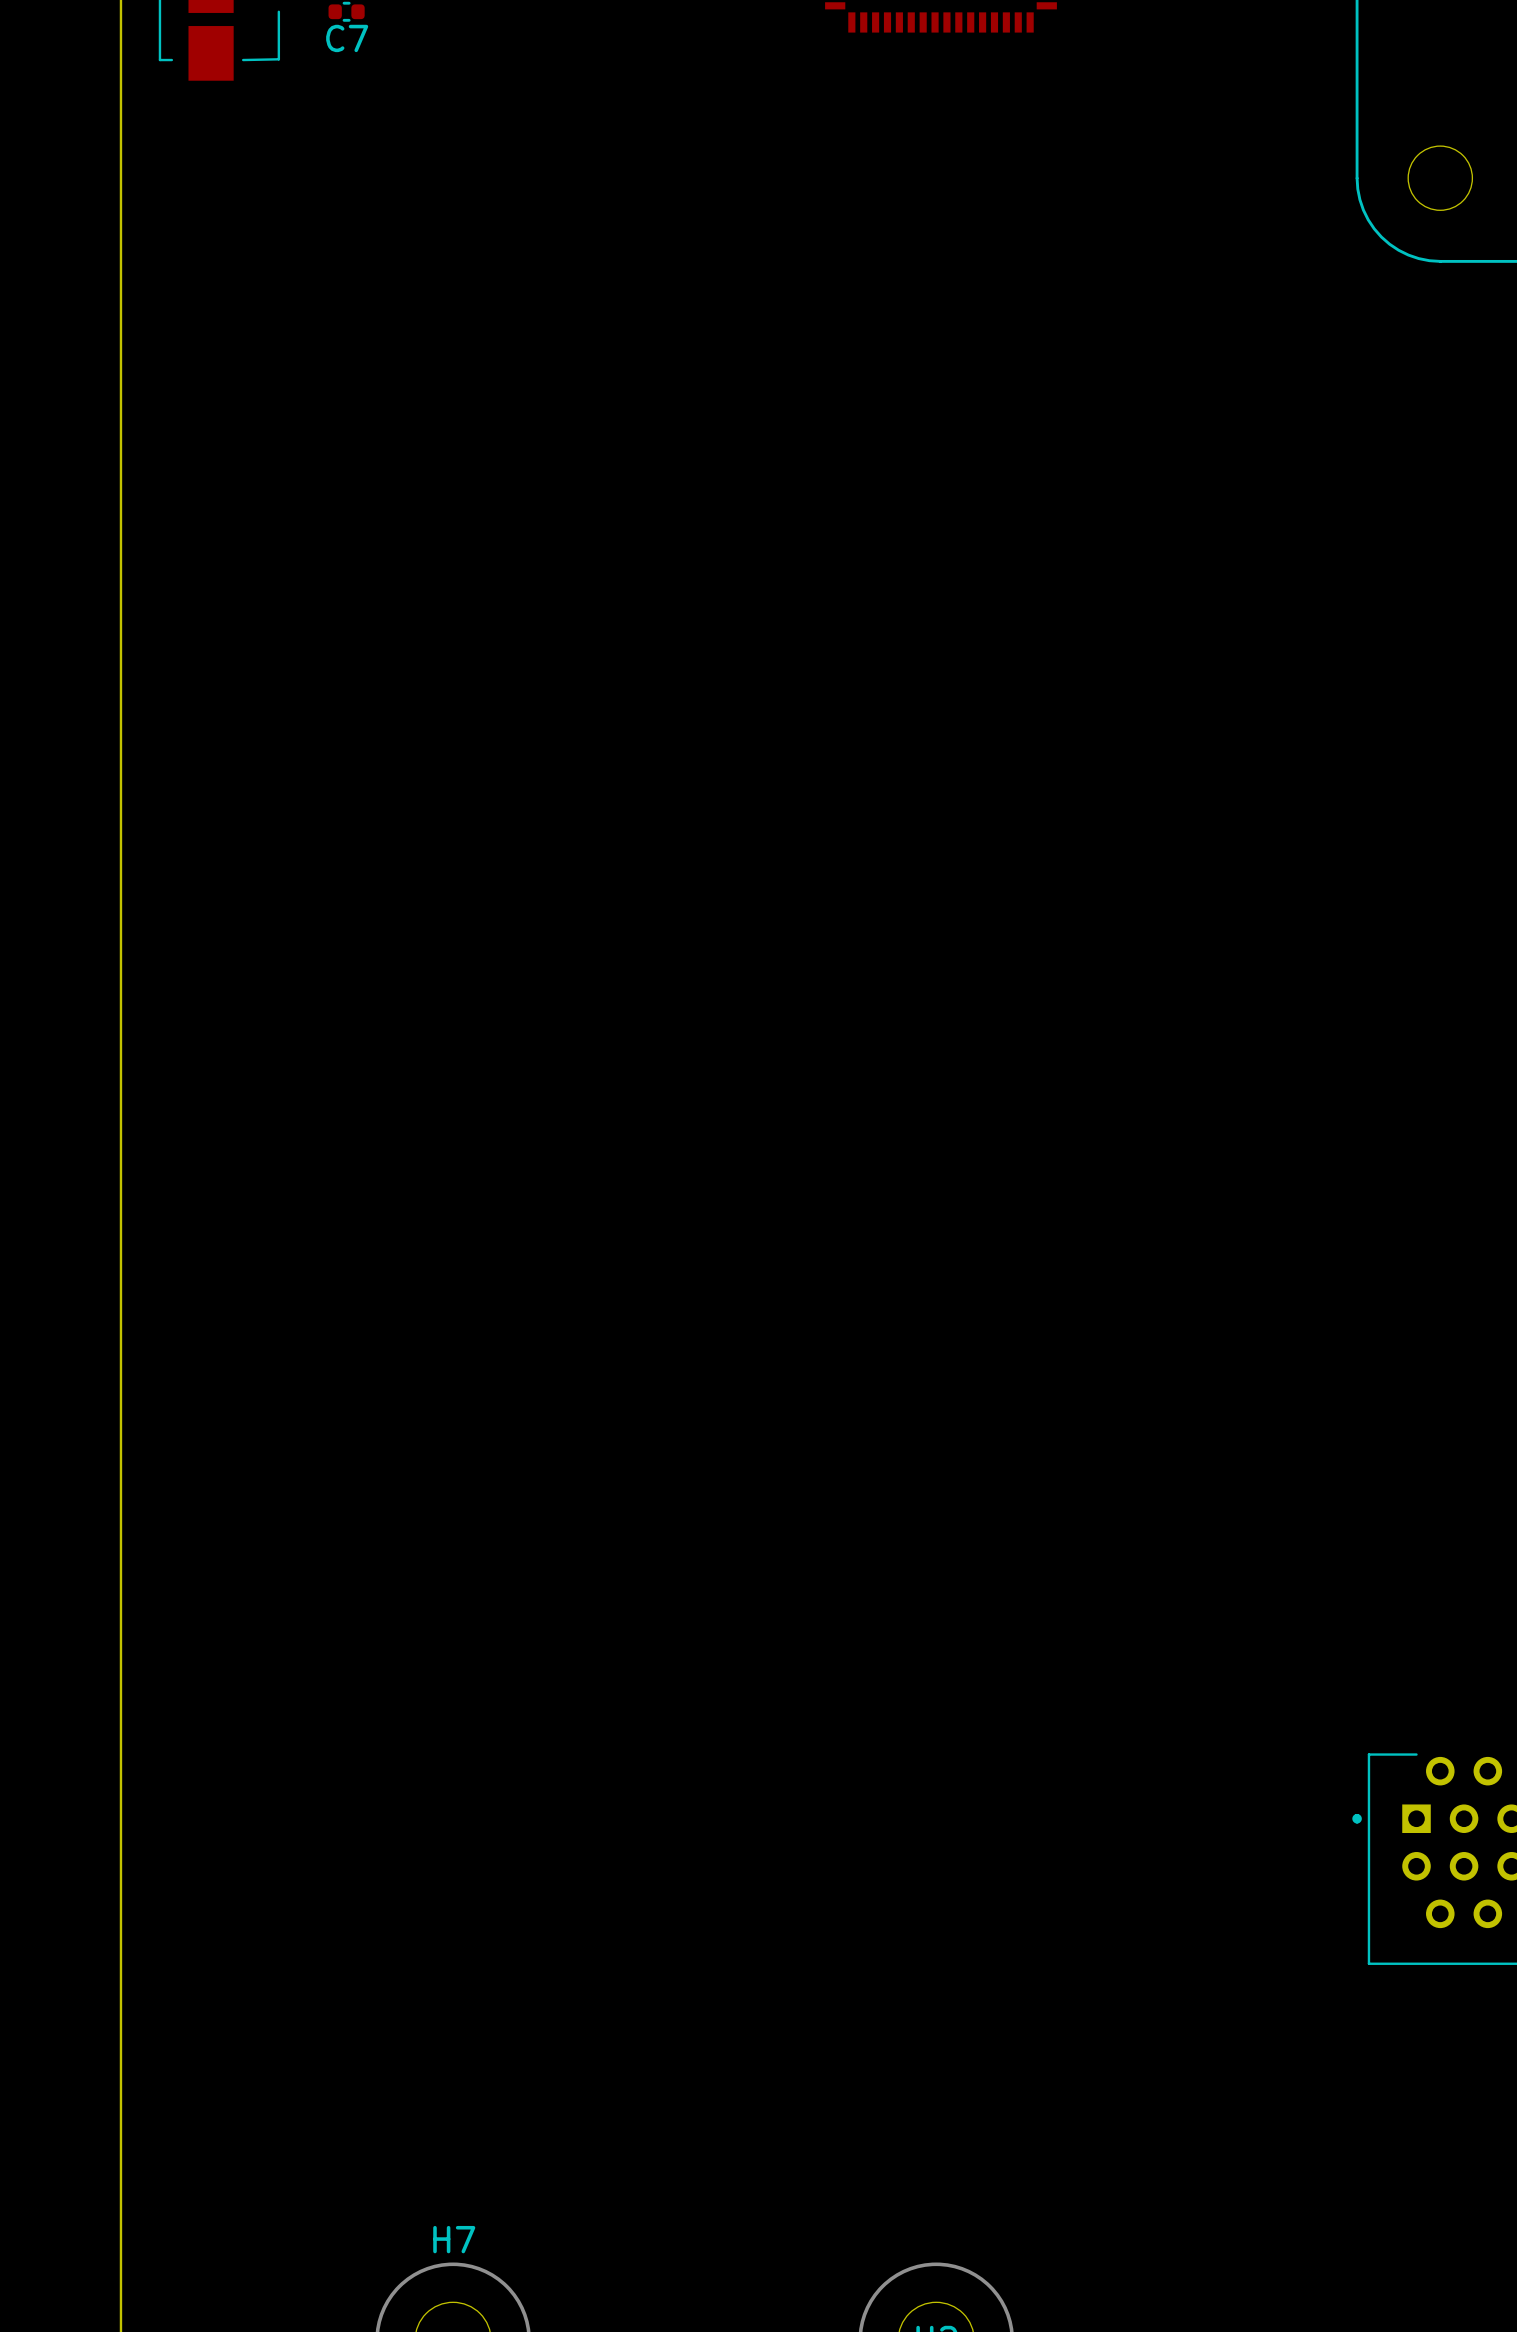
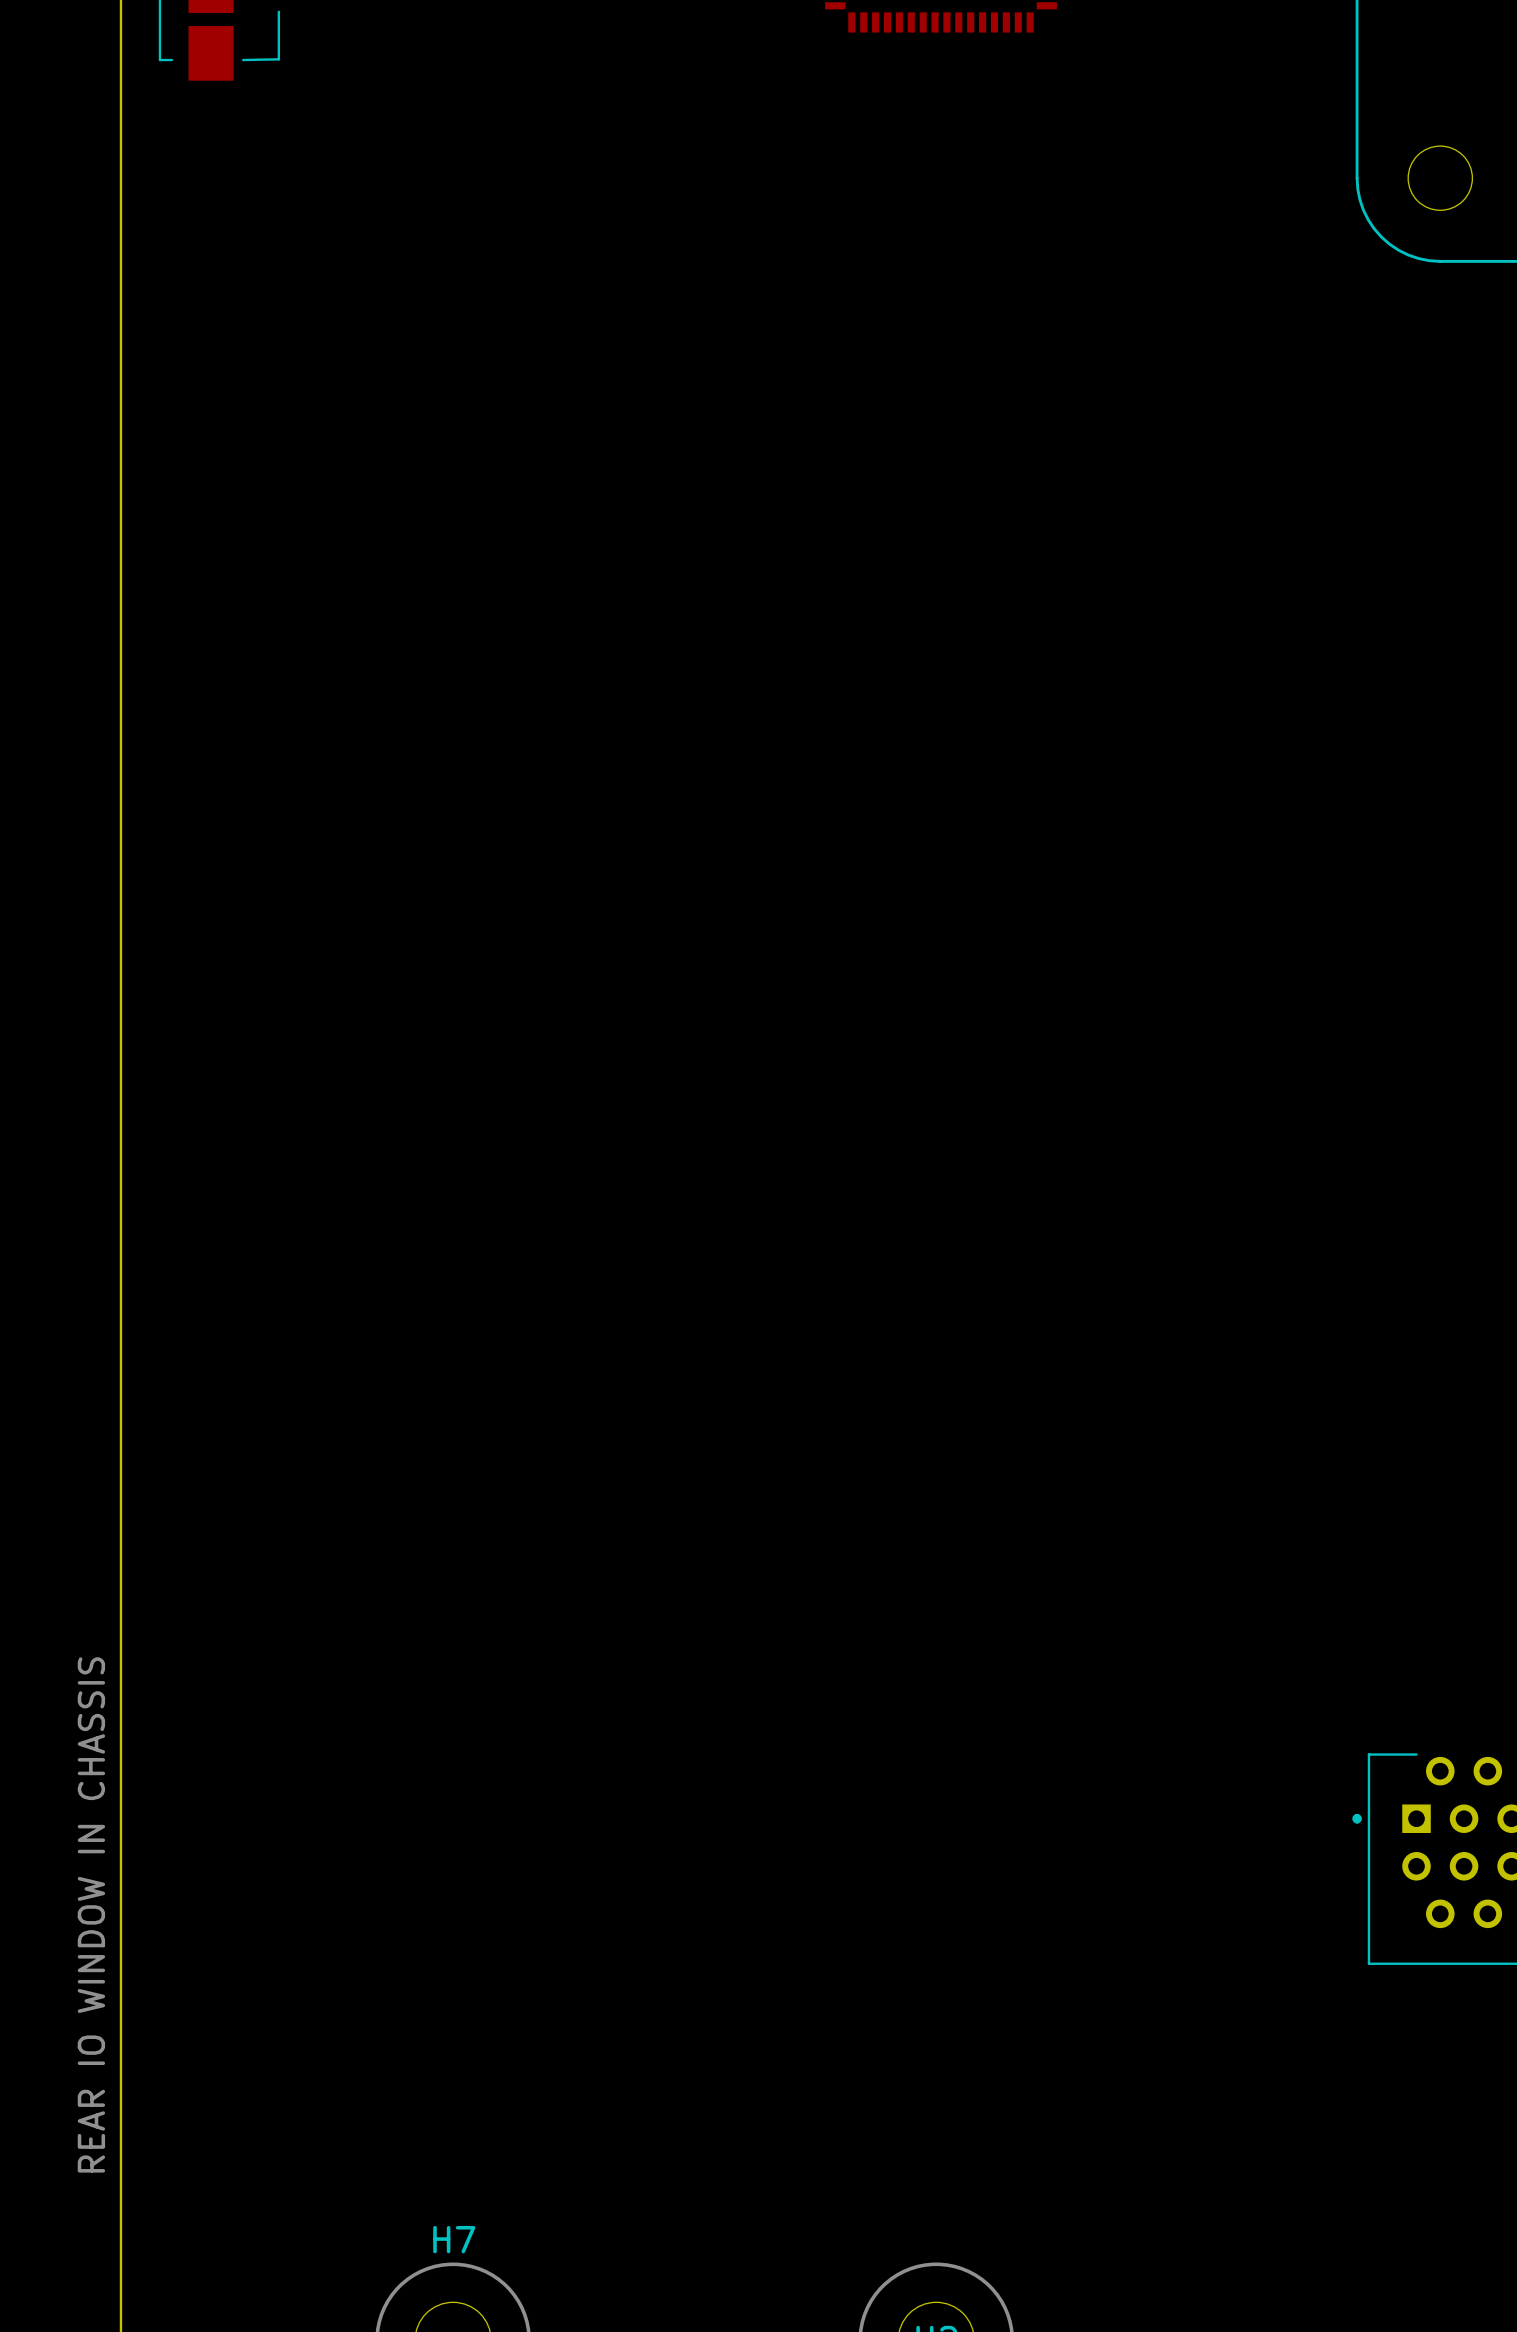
C7: (346, 11) -> none
text: none -> REAR IO WINDOW IN CHASSIS (91, 1914)

